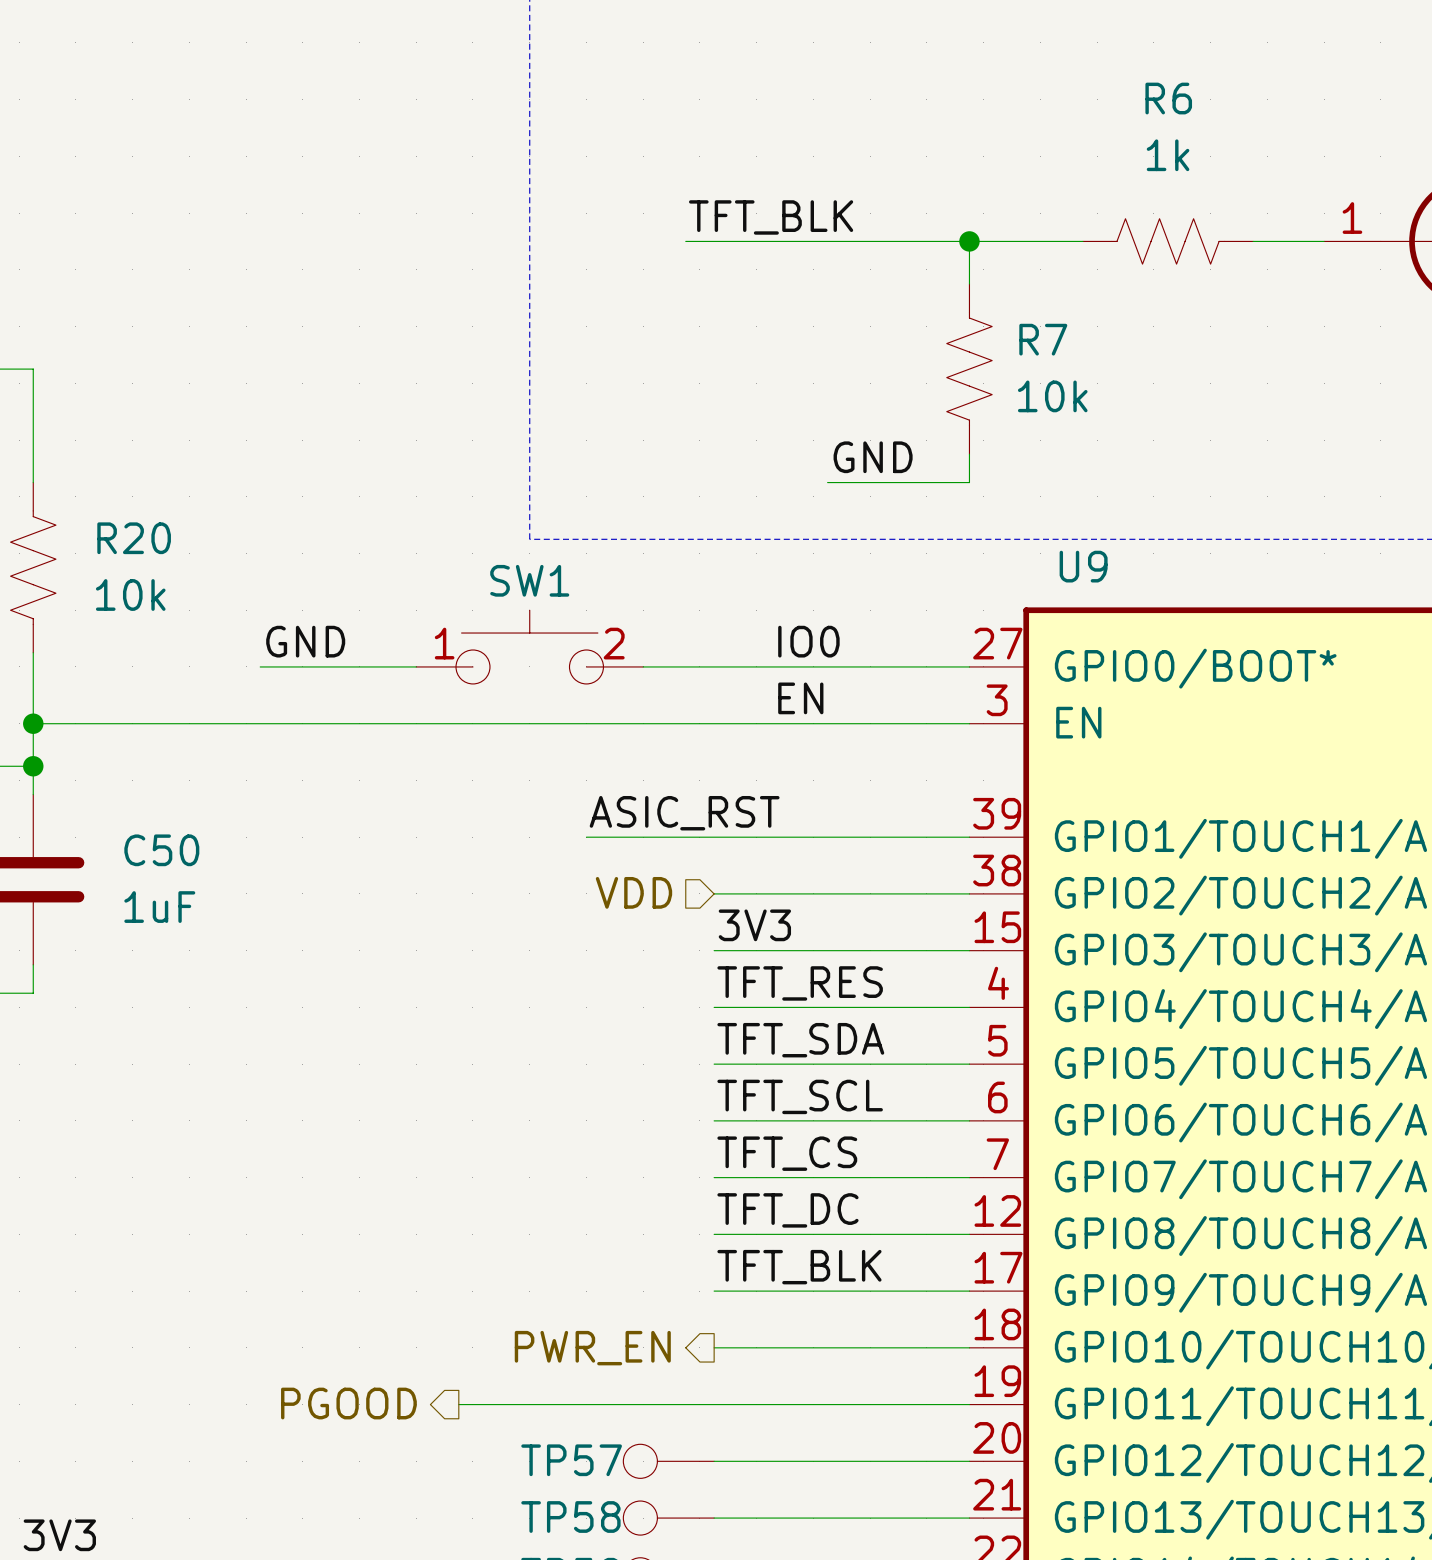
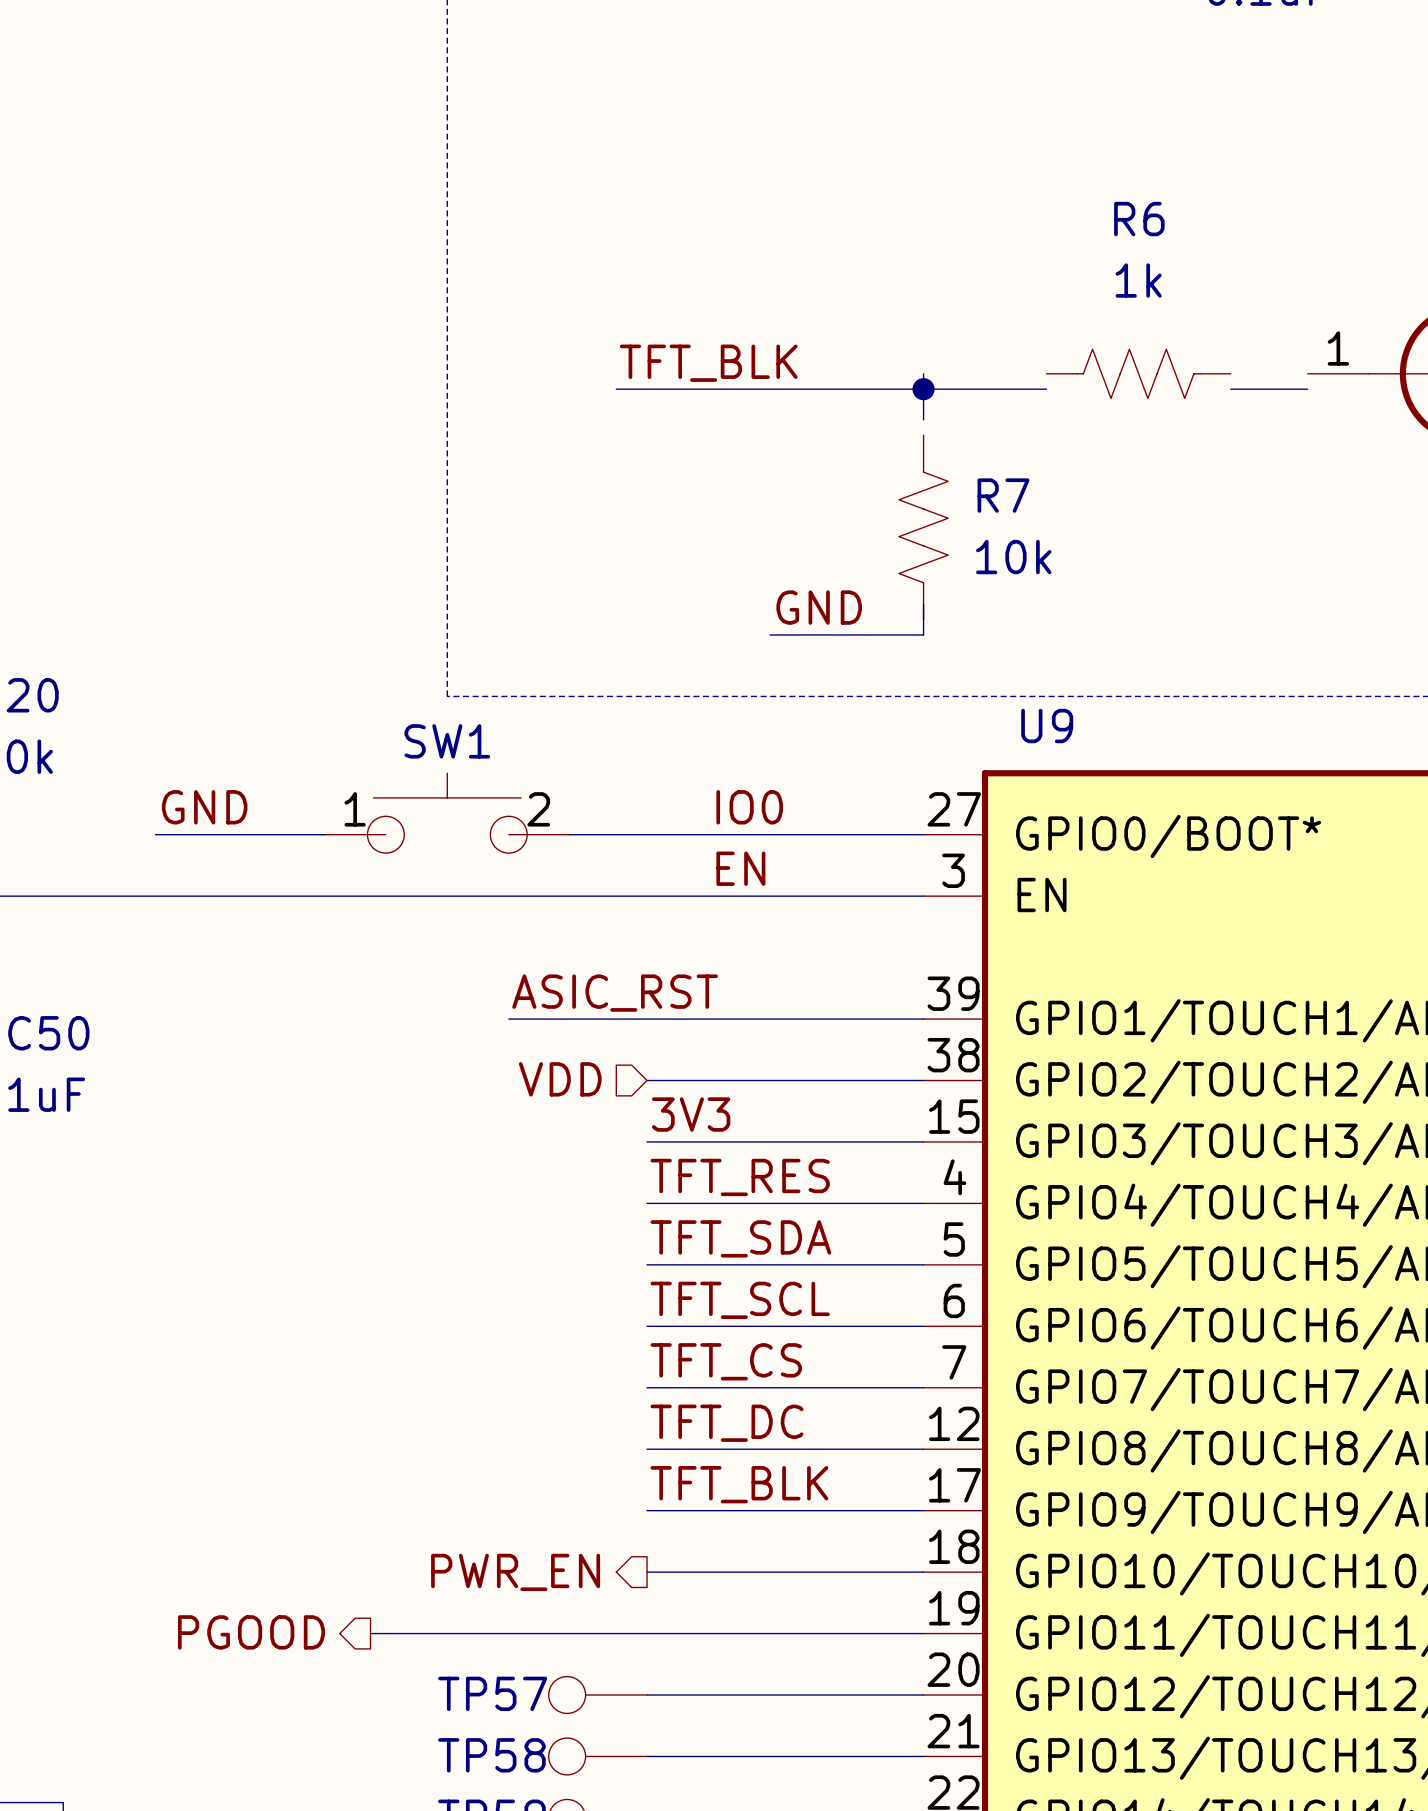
label position: TFT_BLK (771, 217) -> TFT_BLK (708, 363)
wire: (685, 241) (1082, 241) -> (616, 389) (1046, 389)
junction position: (969, 241) -> (923, 389)
wire: (1253, 241) (1324, 241) -> (1230, 389) (1307, 389)
R7 position: (969, 369) -> (923, 527)

